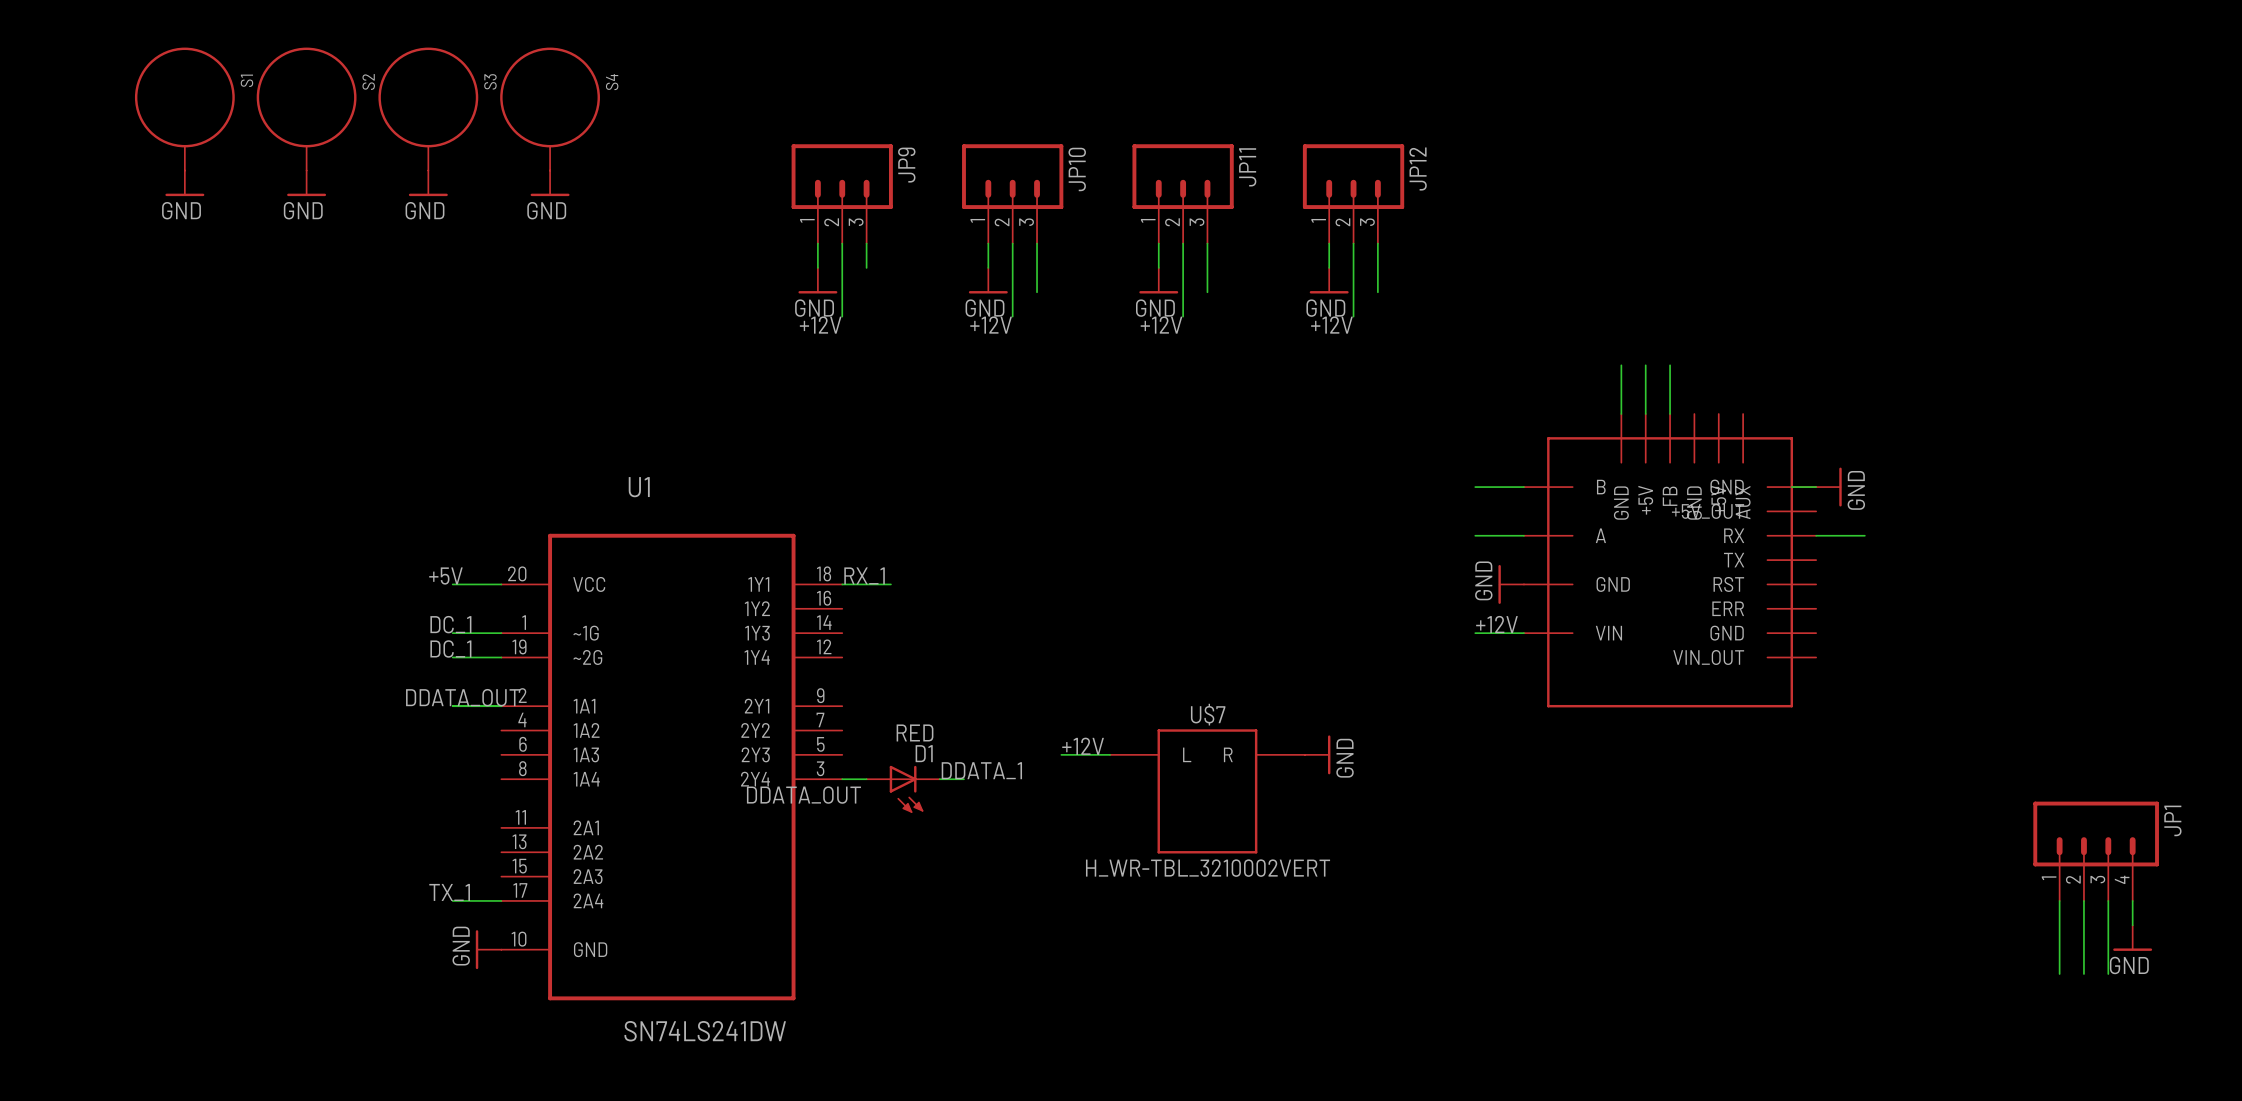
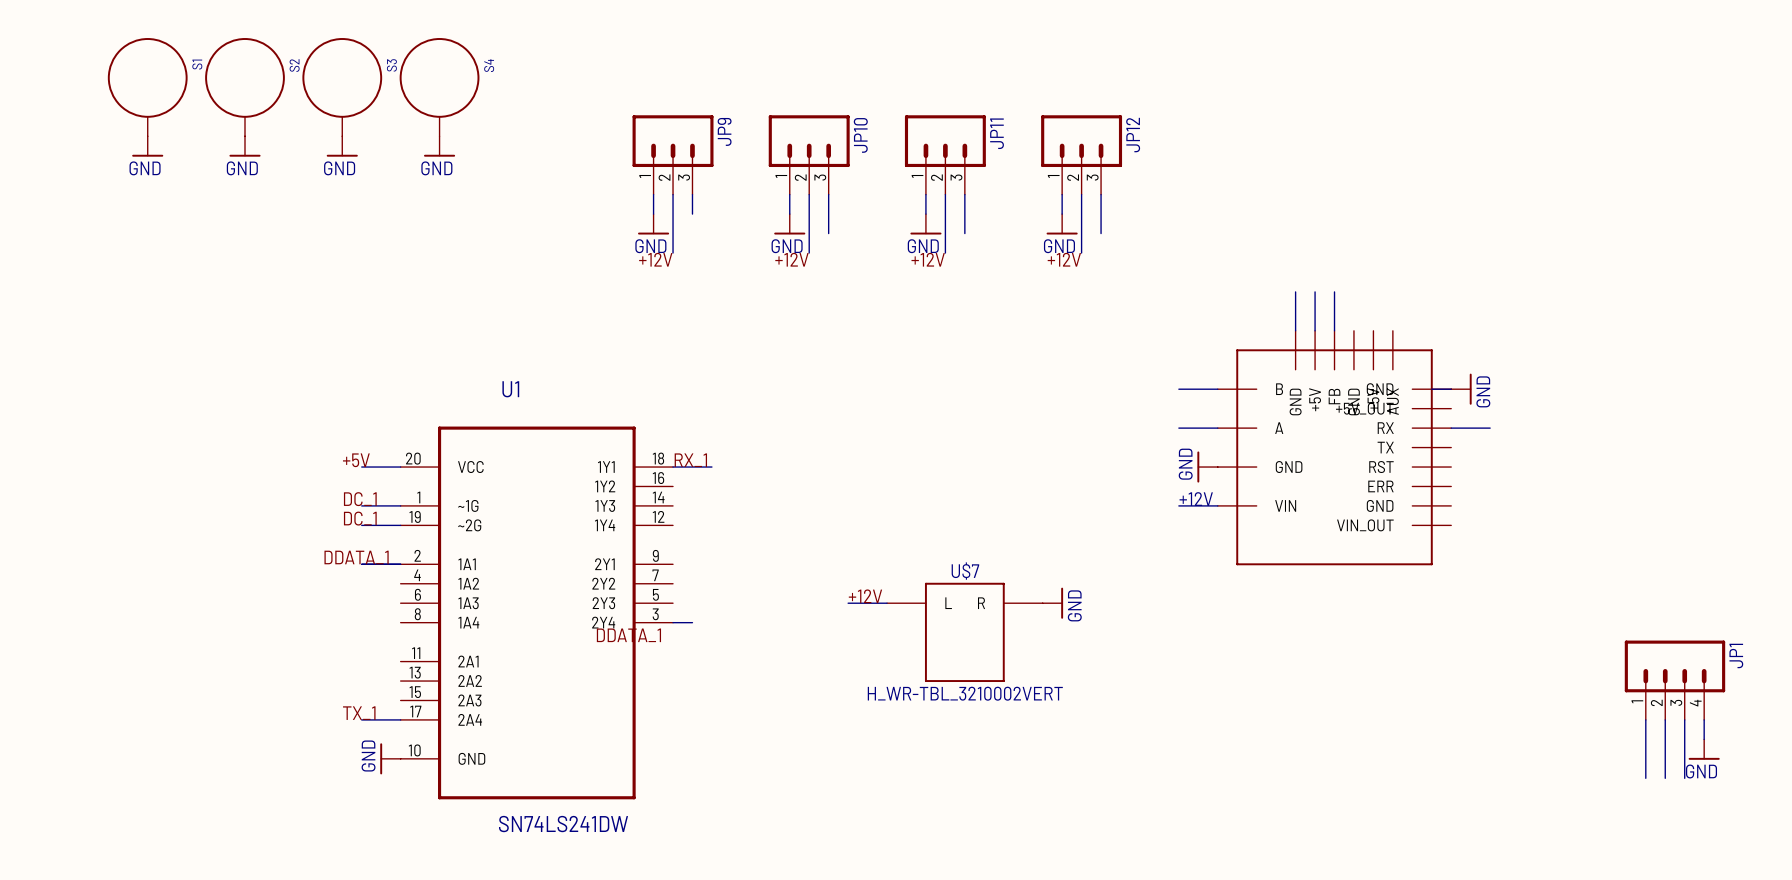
label: DDATA_OUT (463, 697) -> DDATA_1 (356, 557)
label: DDATA_1 (981, 770) -> none
wire: (939, 779) (963, 779) -> none
D1: RED (903, 789) -> none
label: DDATA_OUT (803, 795) -> DDATA_1 (628, 635)

